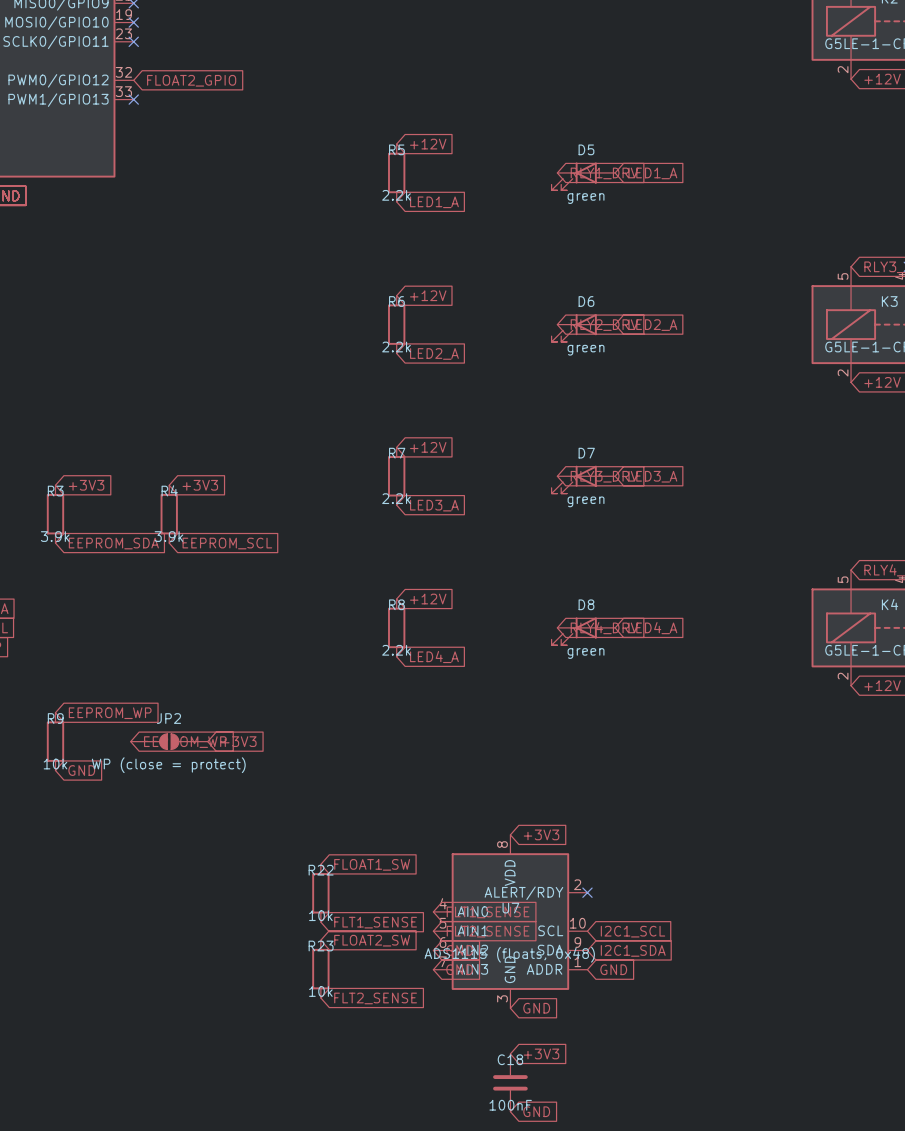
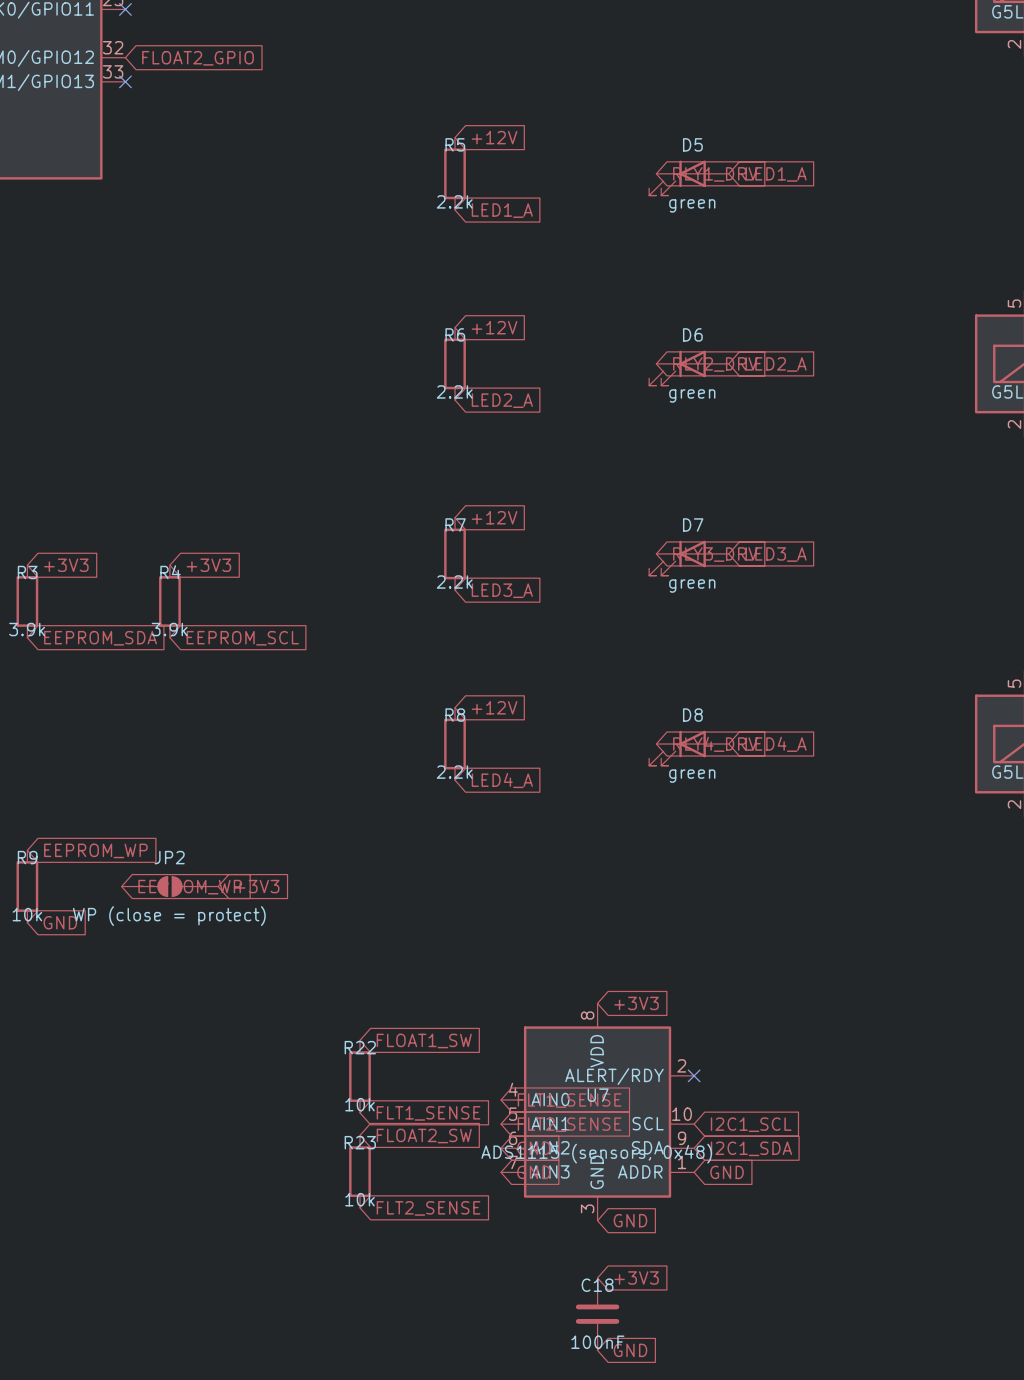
U7 value: ADS1115 (floats, 0x48) (509, 954) -> ADS1115 (sensors, 0x48) (596, 1153)

